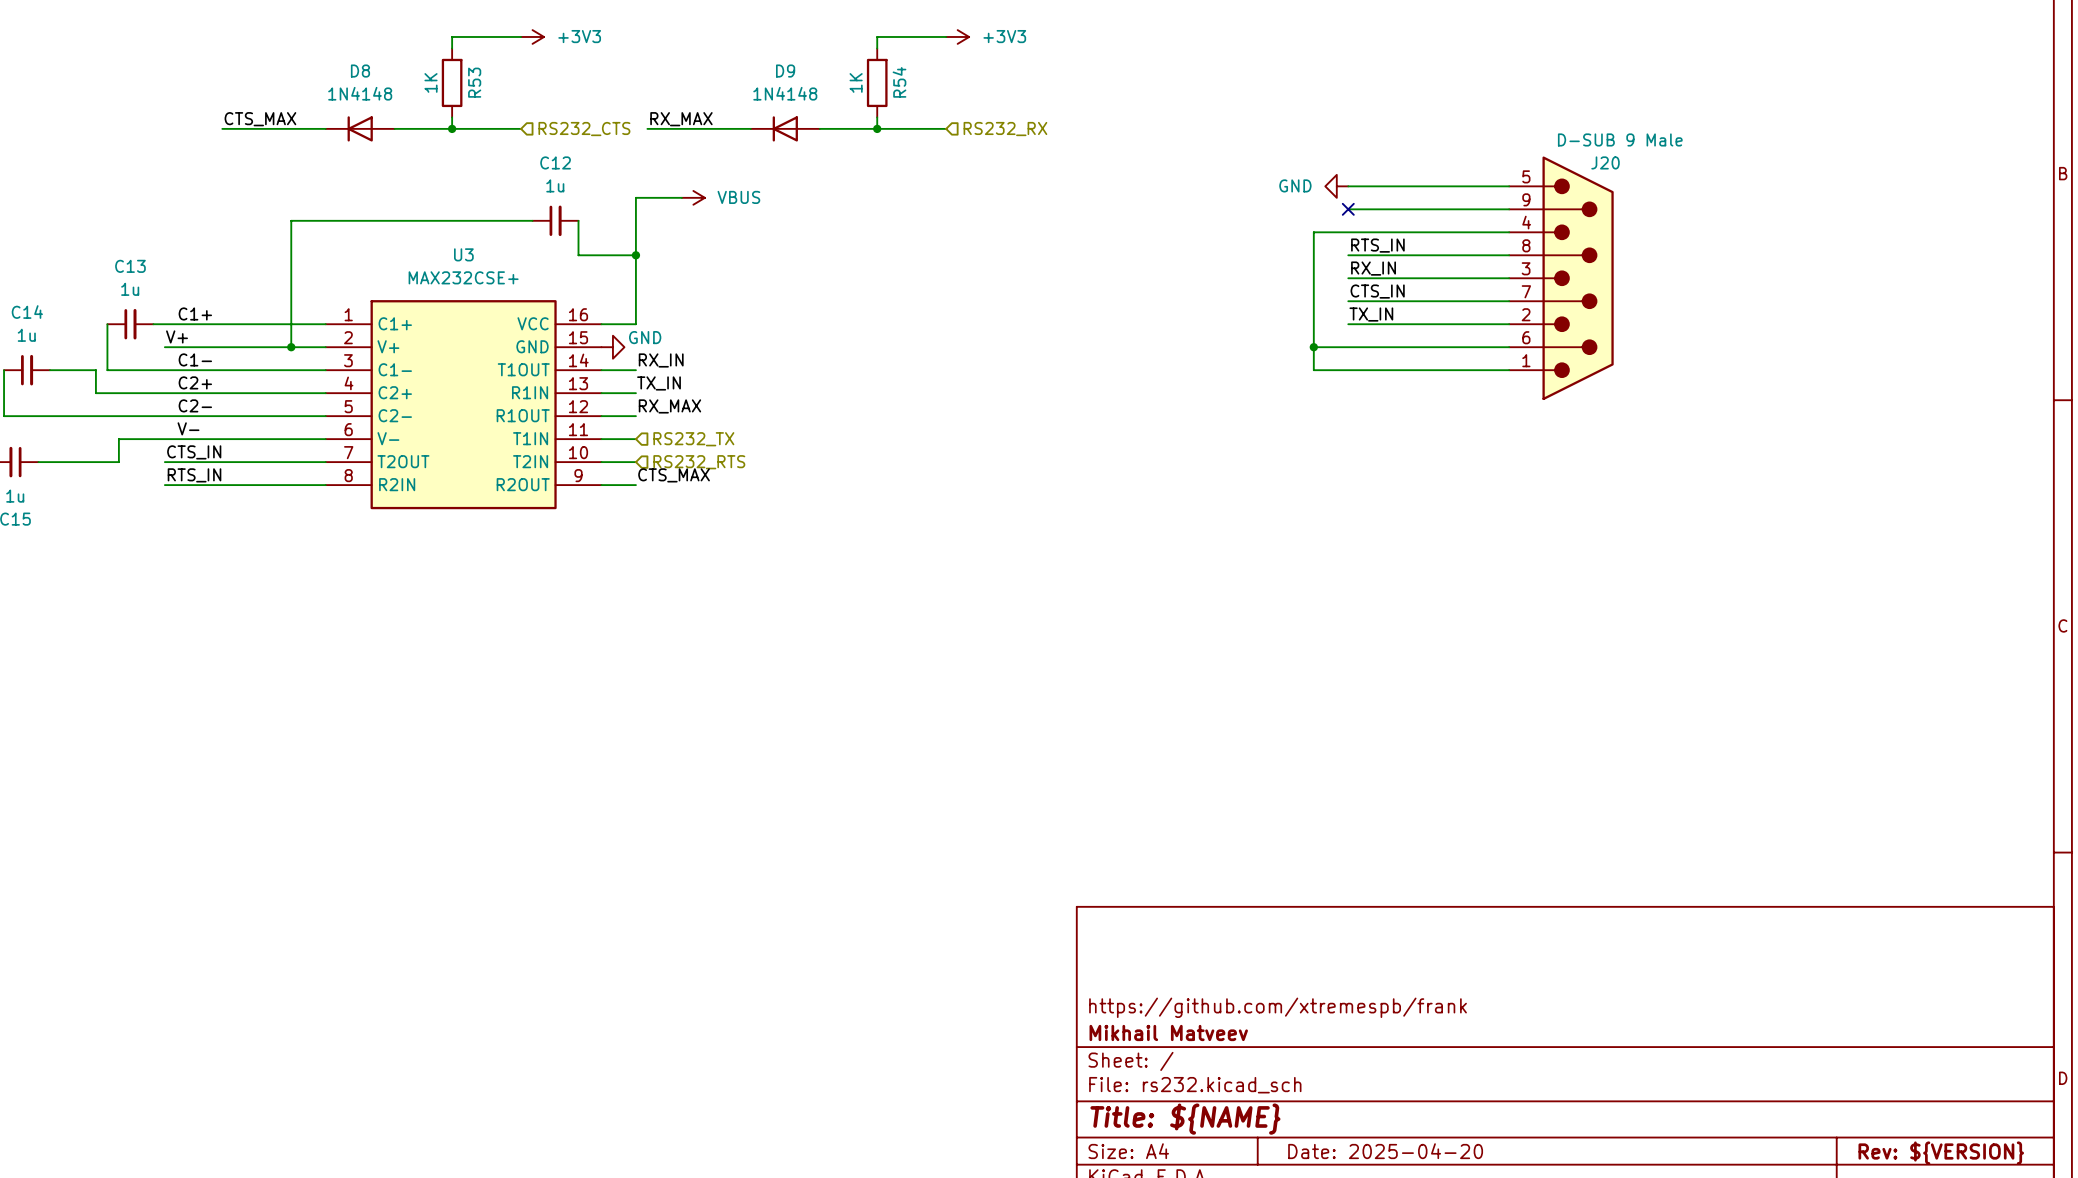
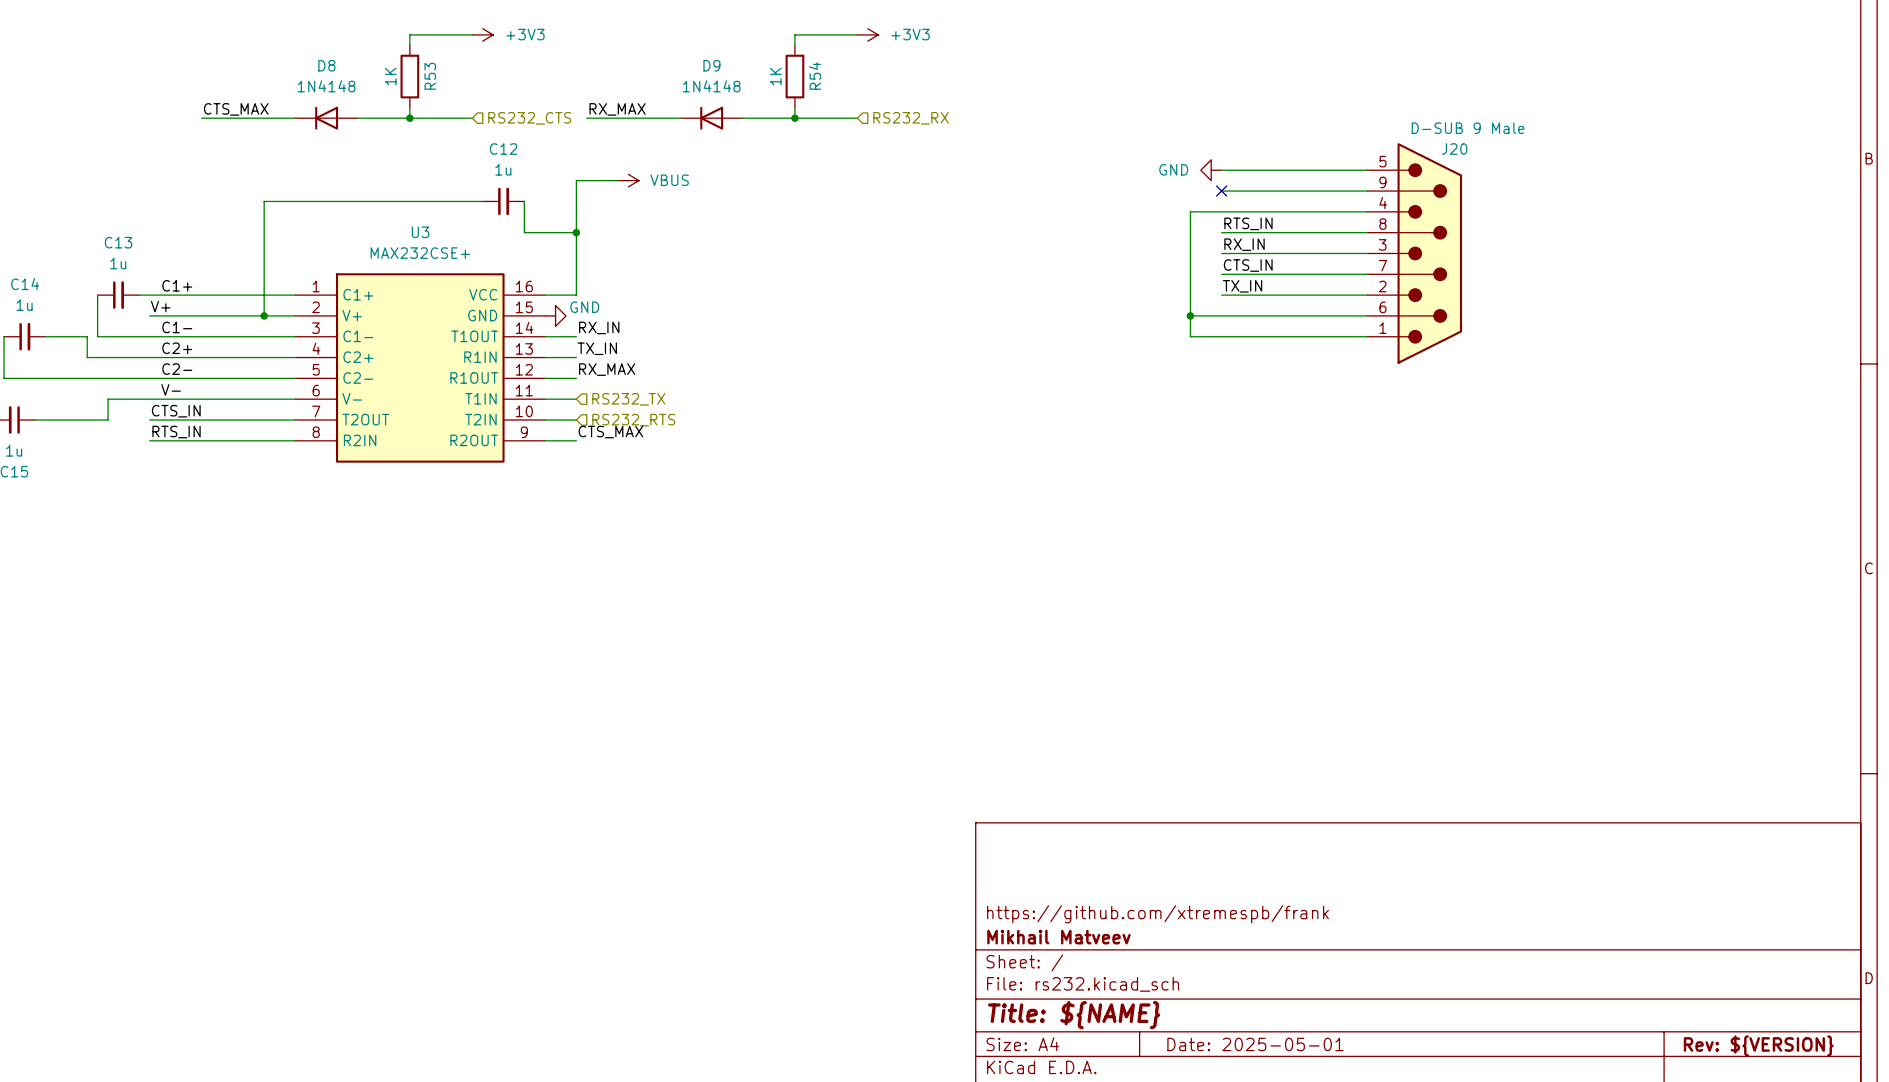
title block: Date: 2025-04-20 (1385, 1151) -> Date: 2025-05-01 (1255, 1044)

